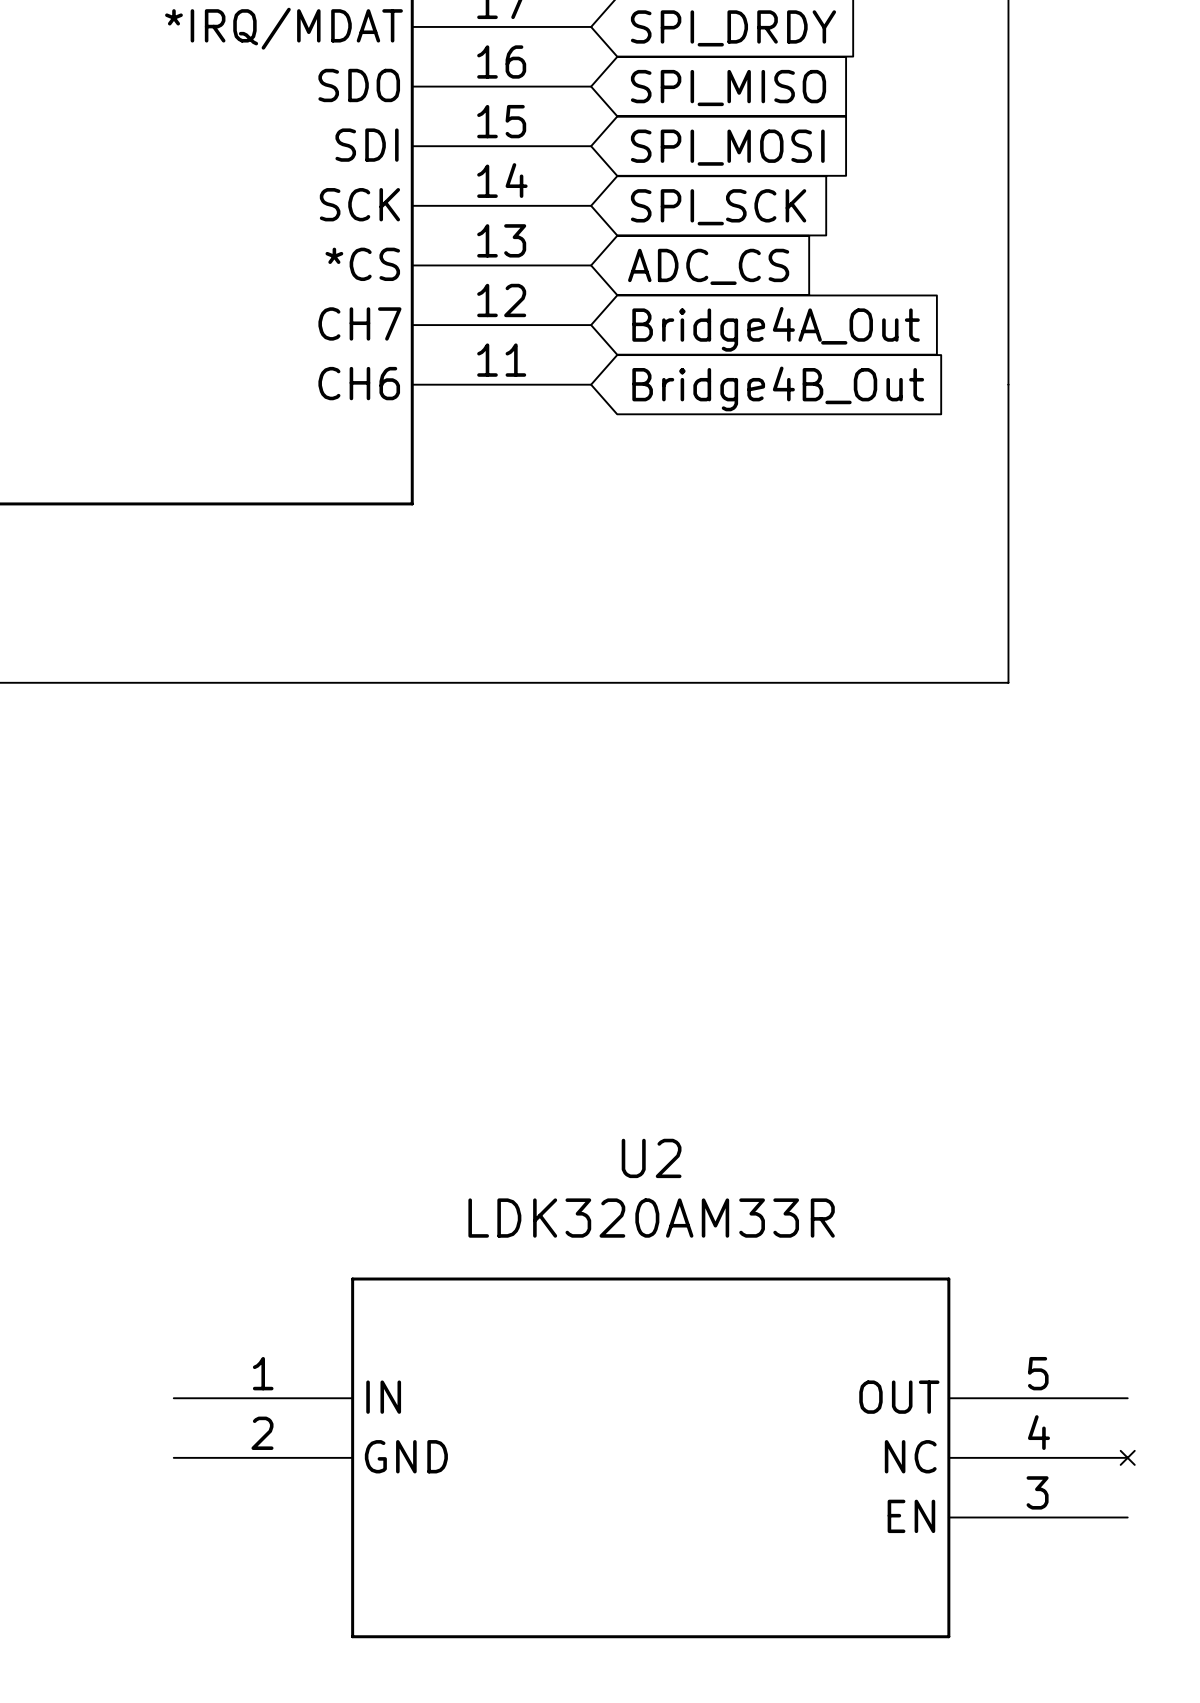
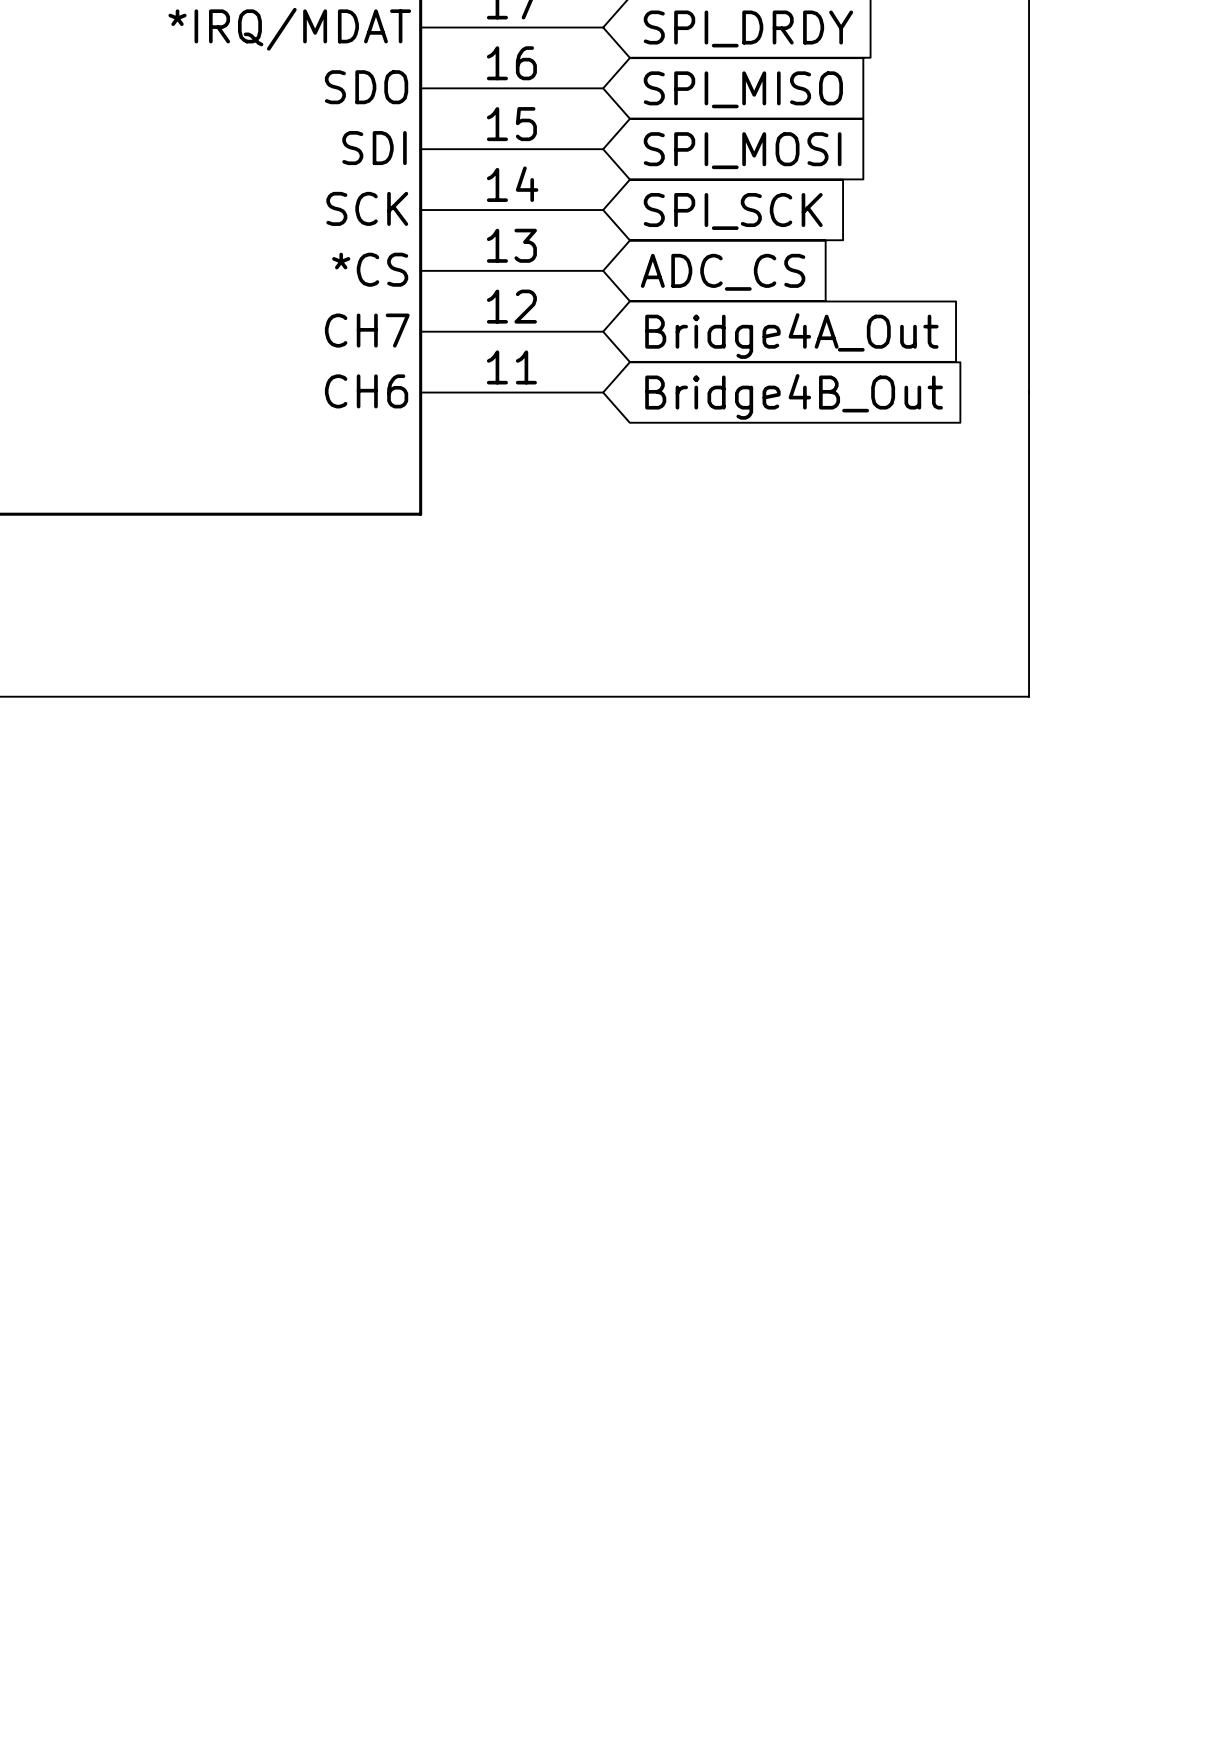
U2: LDK320AM33R (654, 1457) -> none

